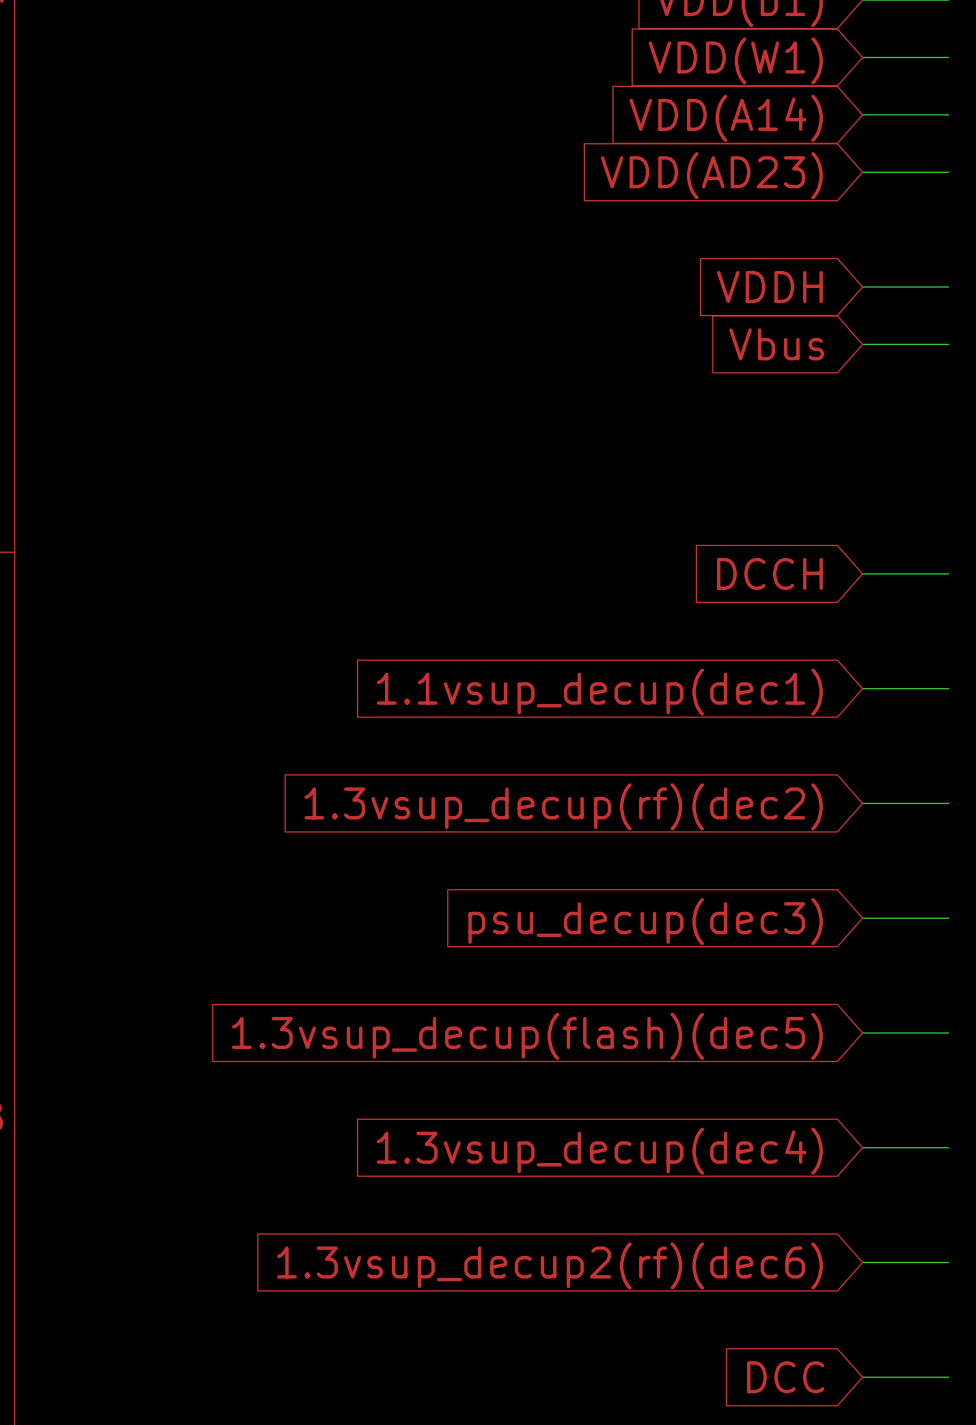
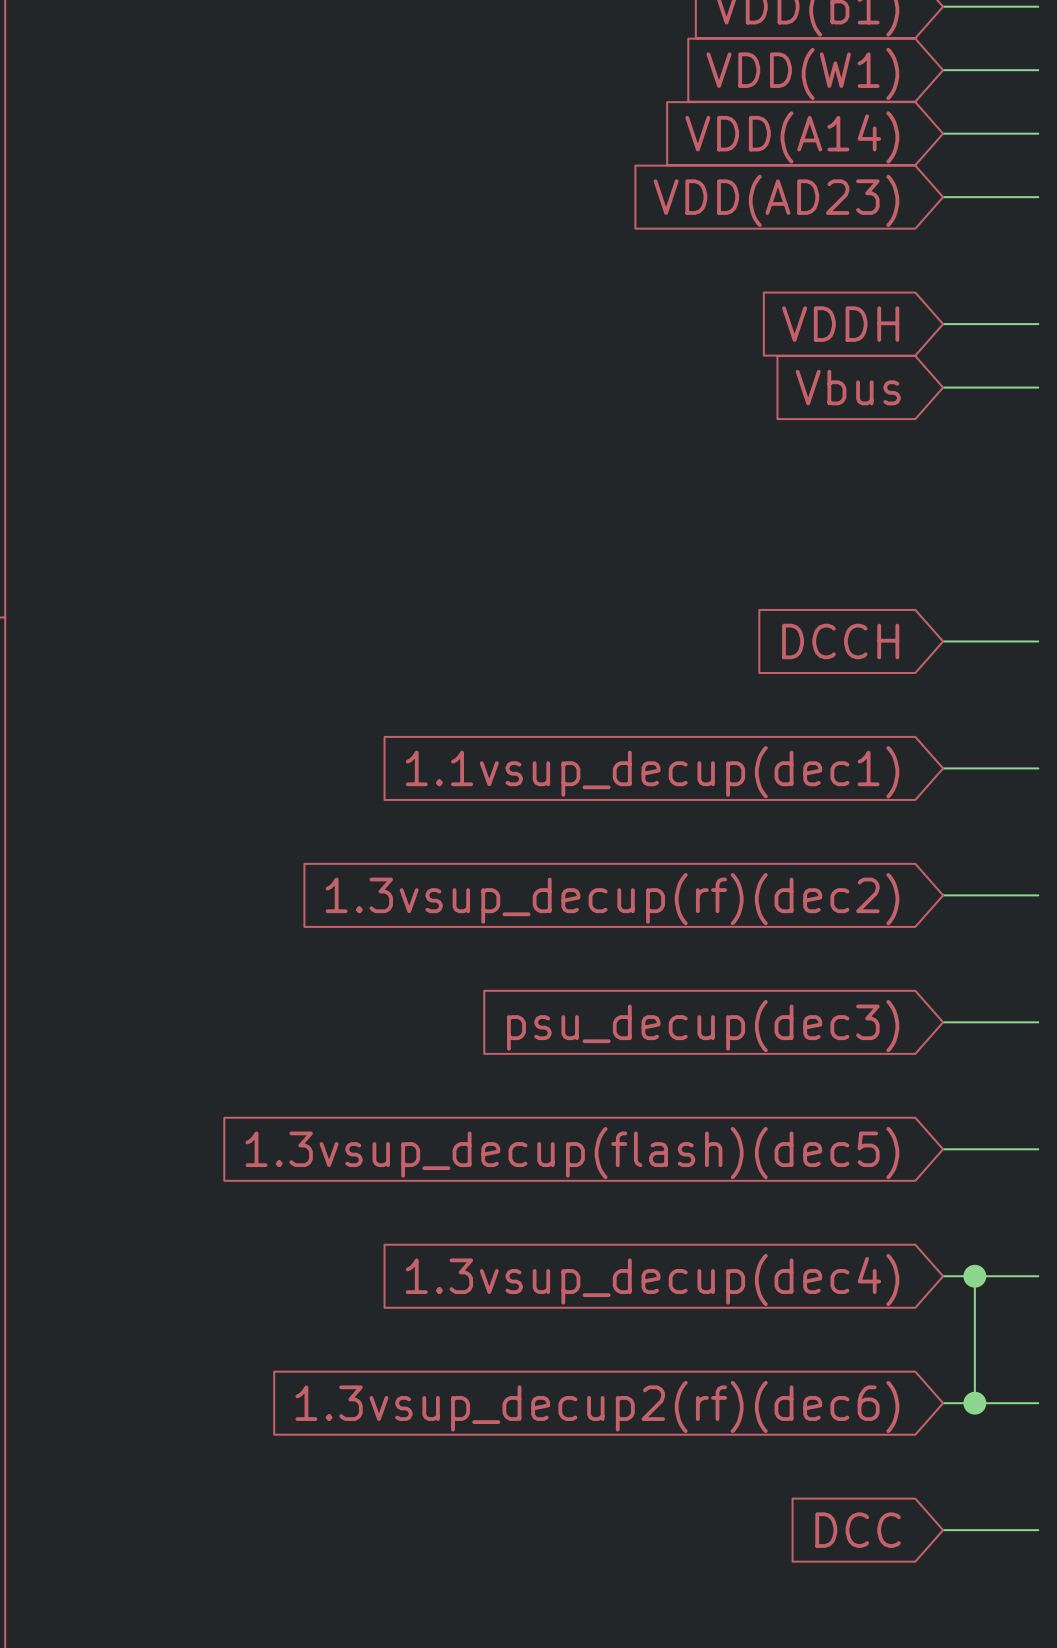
wire: none -> (974, 1276) (974, 1403)
junction: none -> (974, 1276)
junction: none -> (974, 1403)

